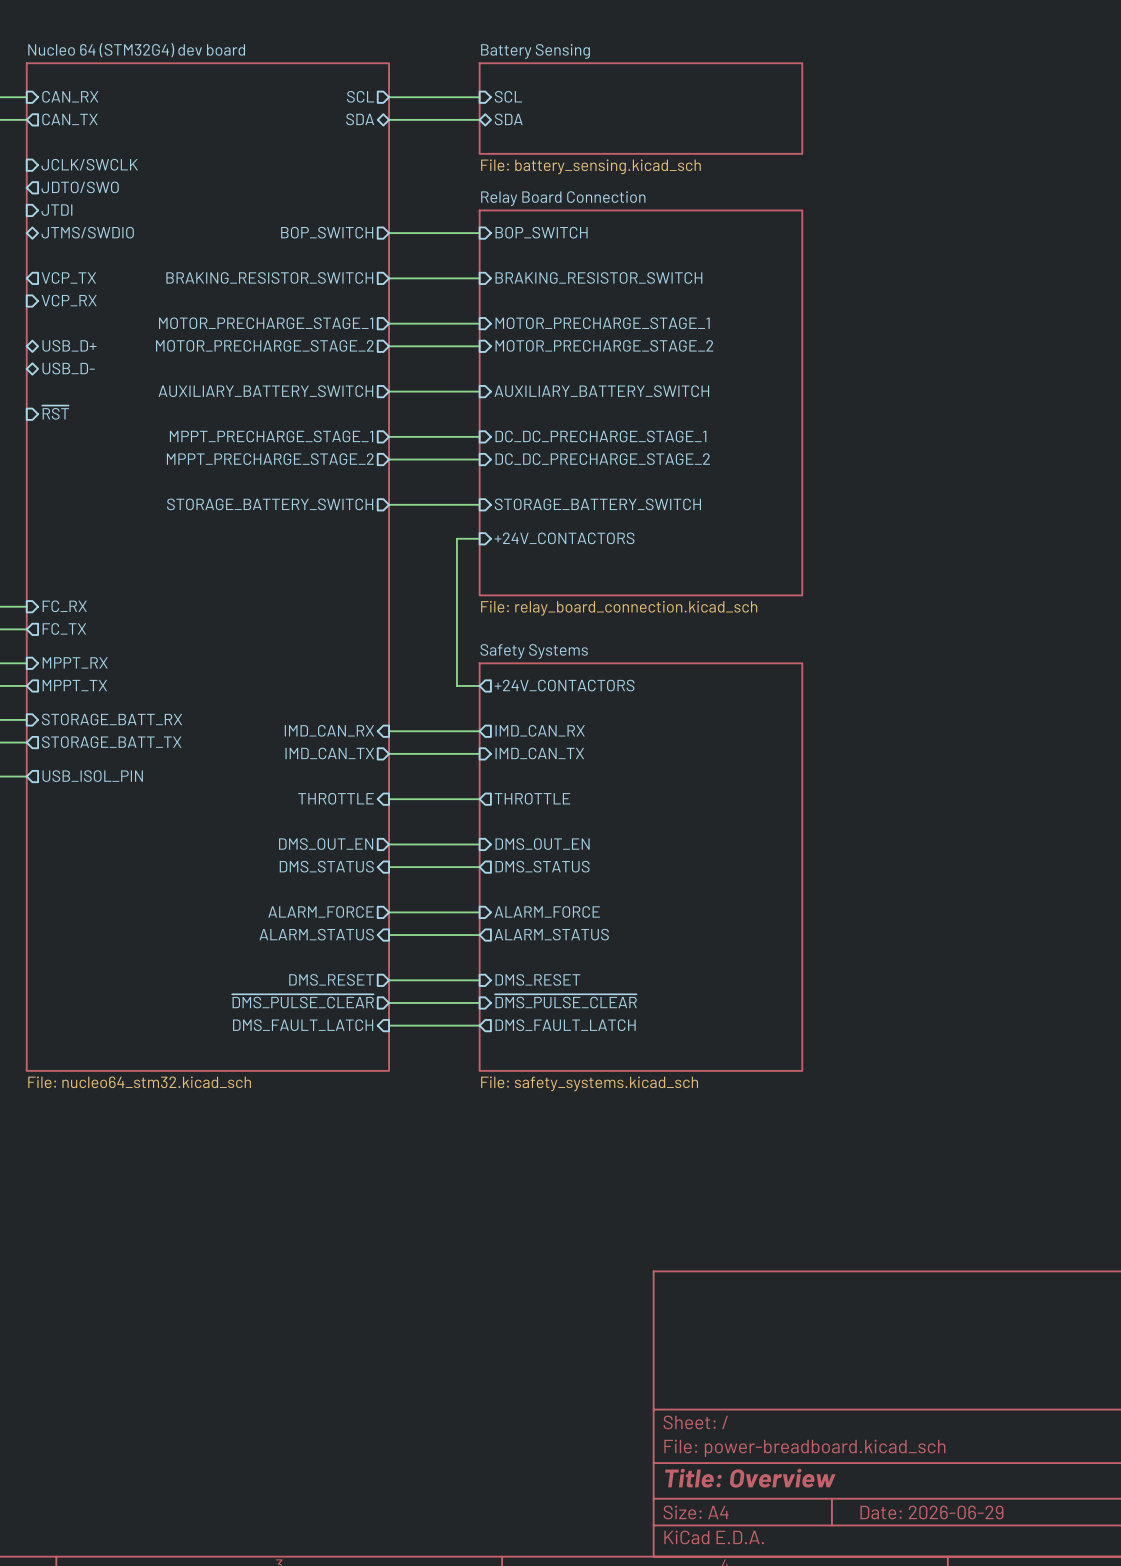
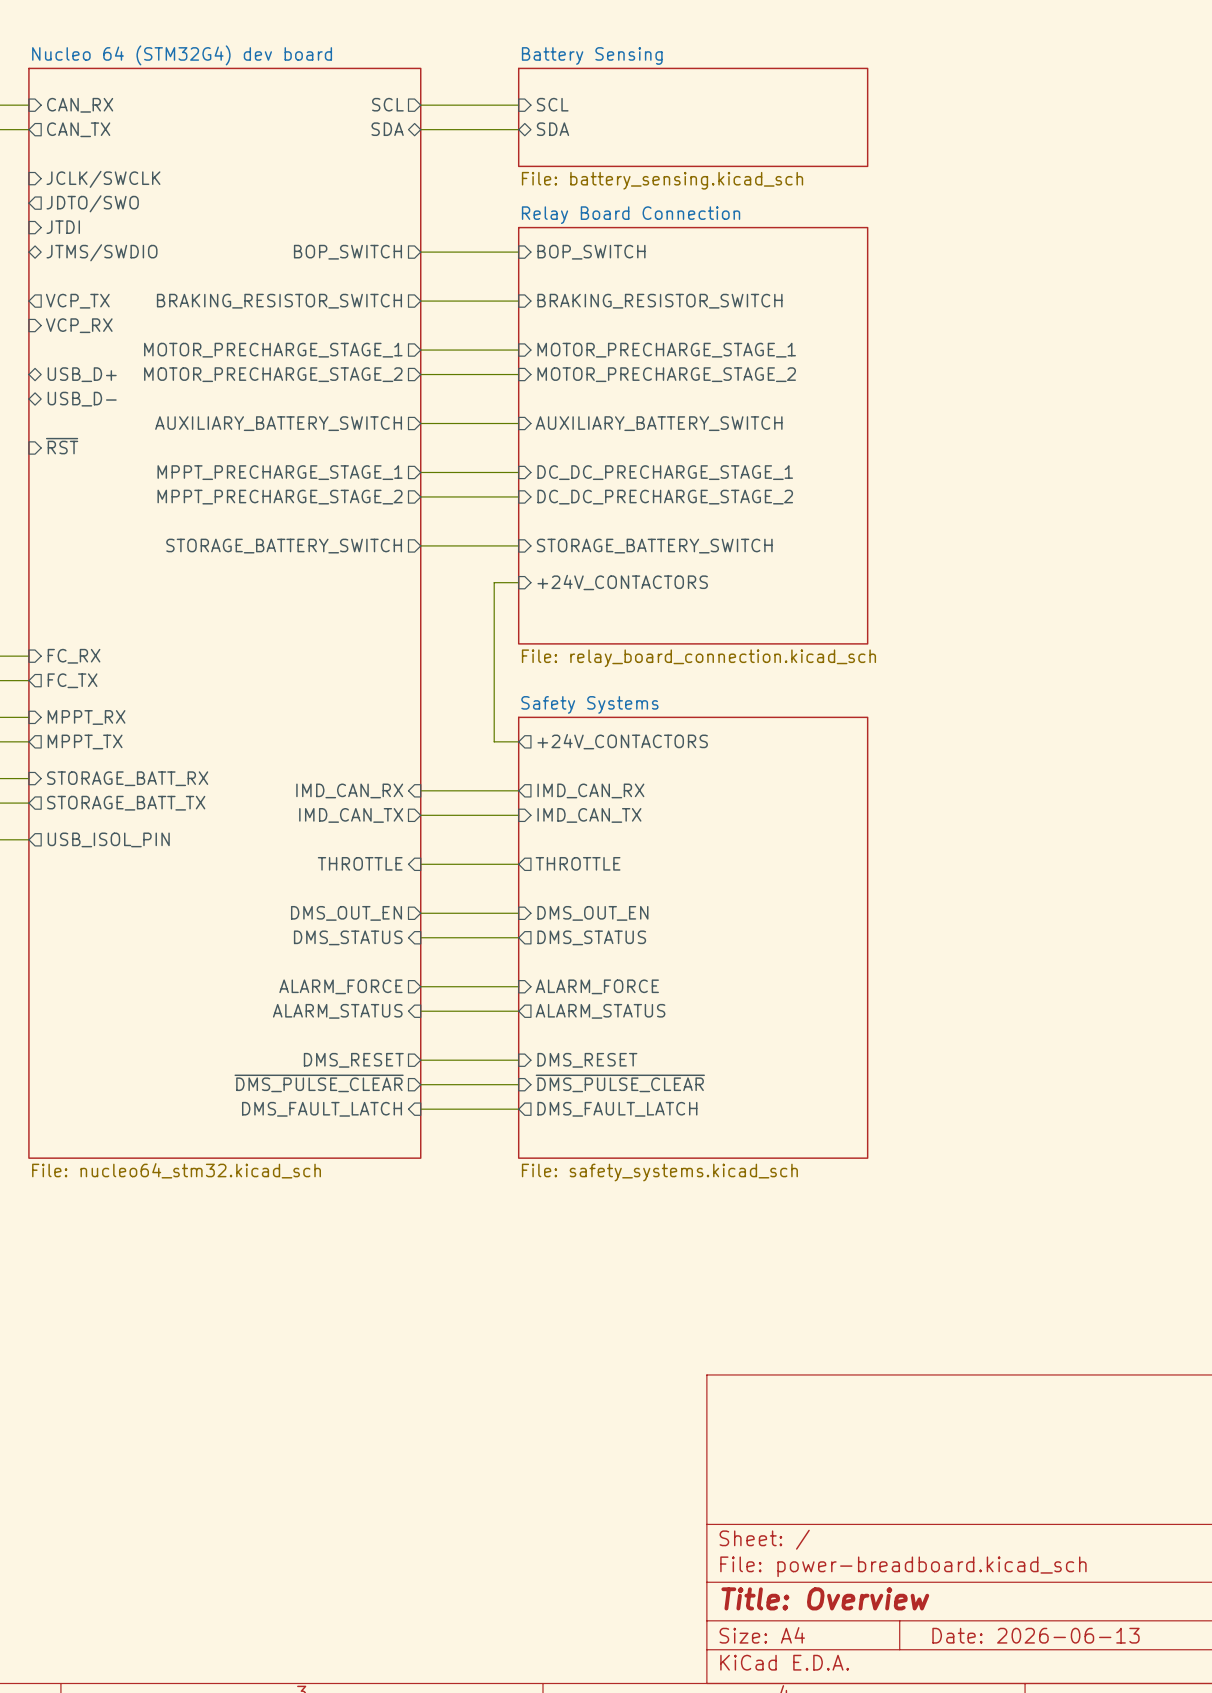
title block: Date: 2026-06-29 (931, 1512) -> Date: 2026-06-13 (1035, 1635)

